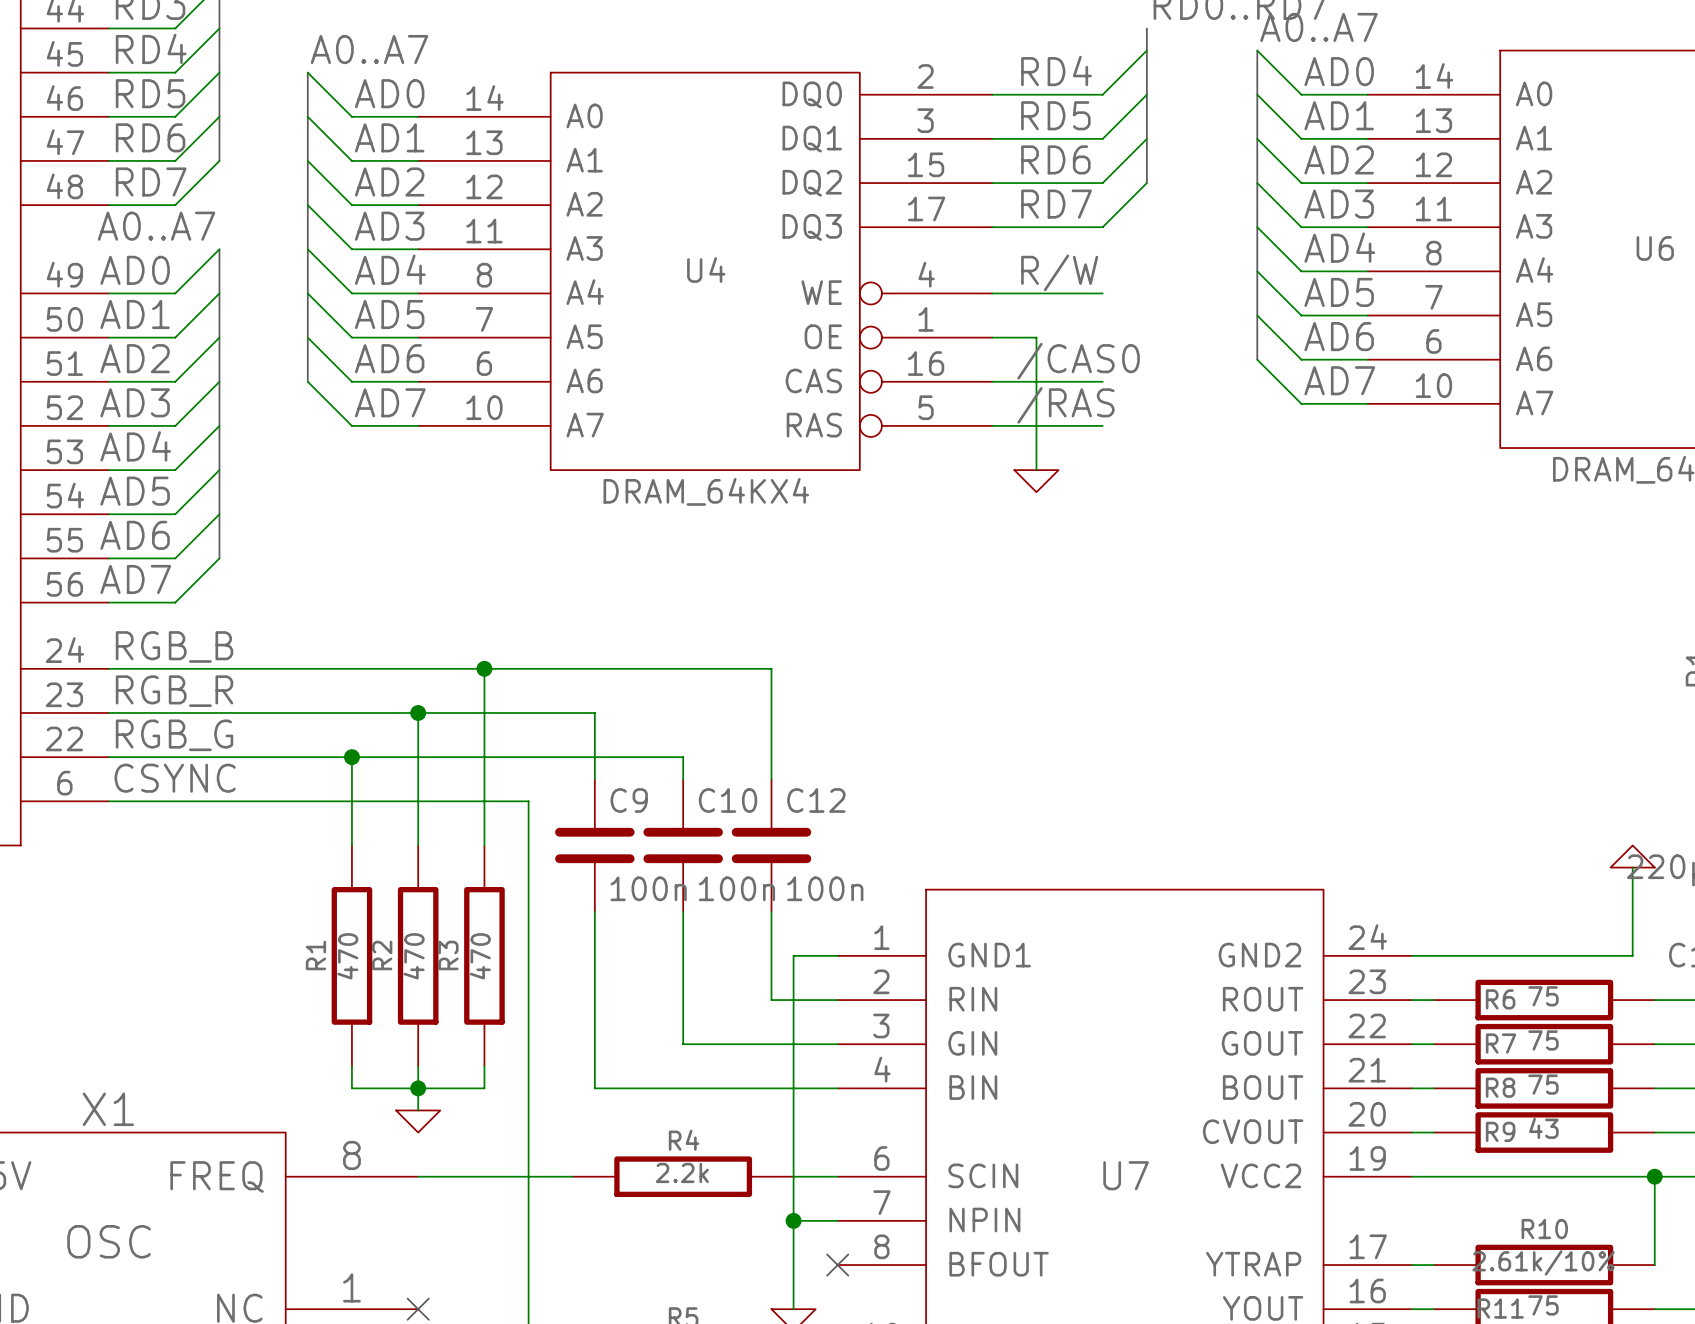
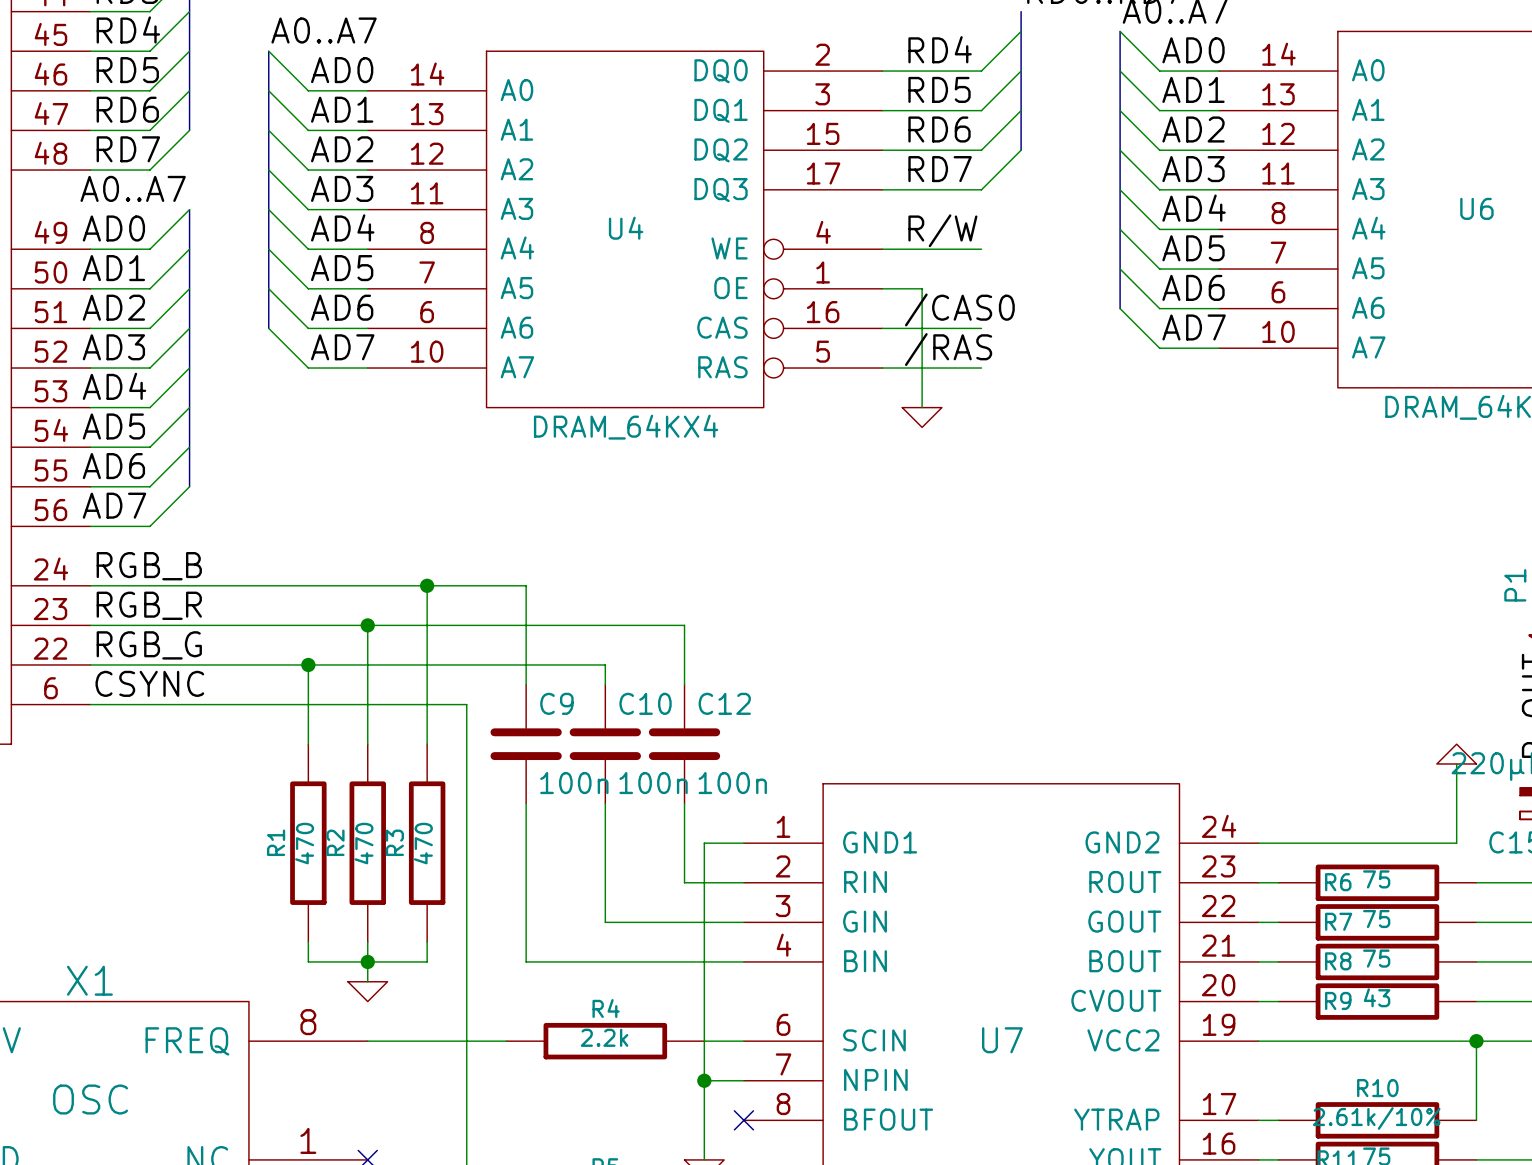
wire: (594, 668) (771, 668) (771, 713) -> (526, 585) (526, 625) (684, 625)

